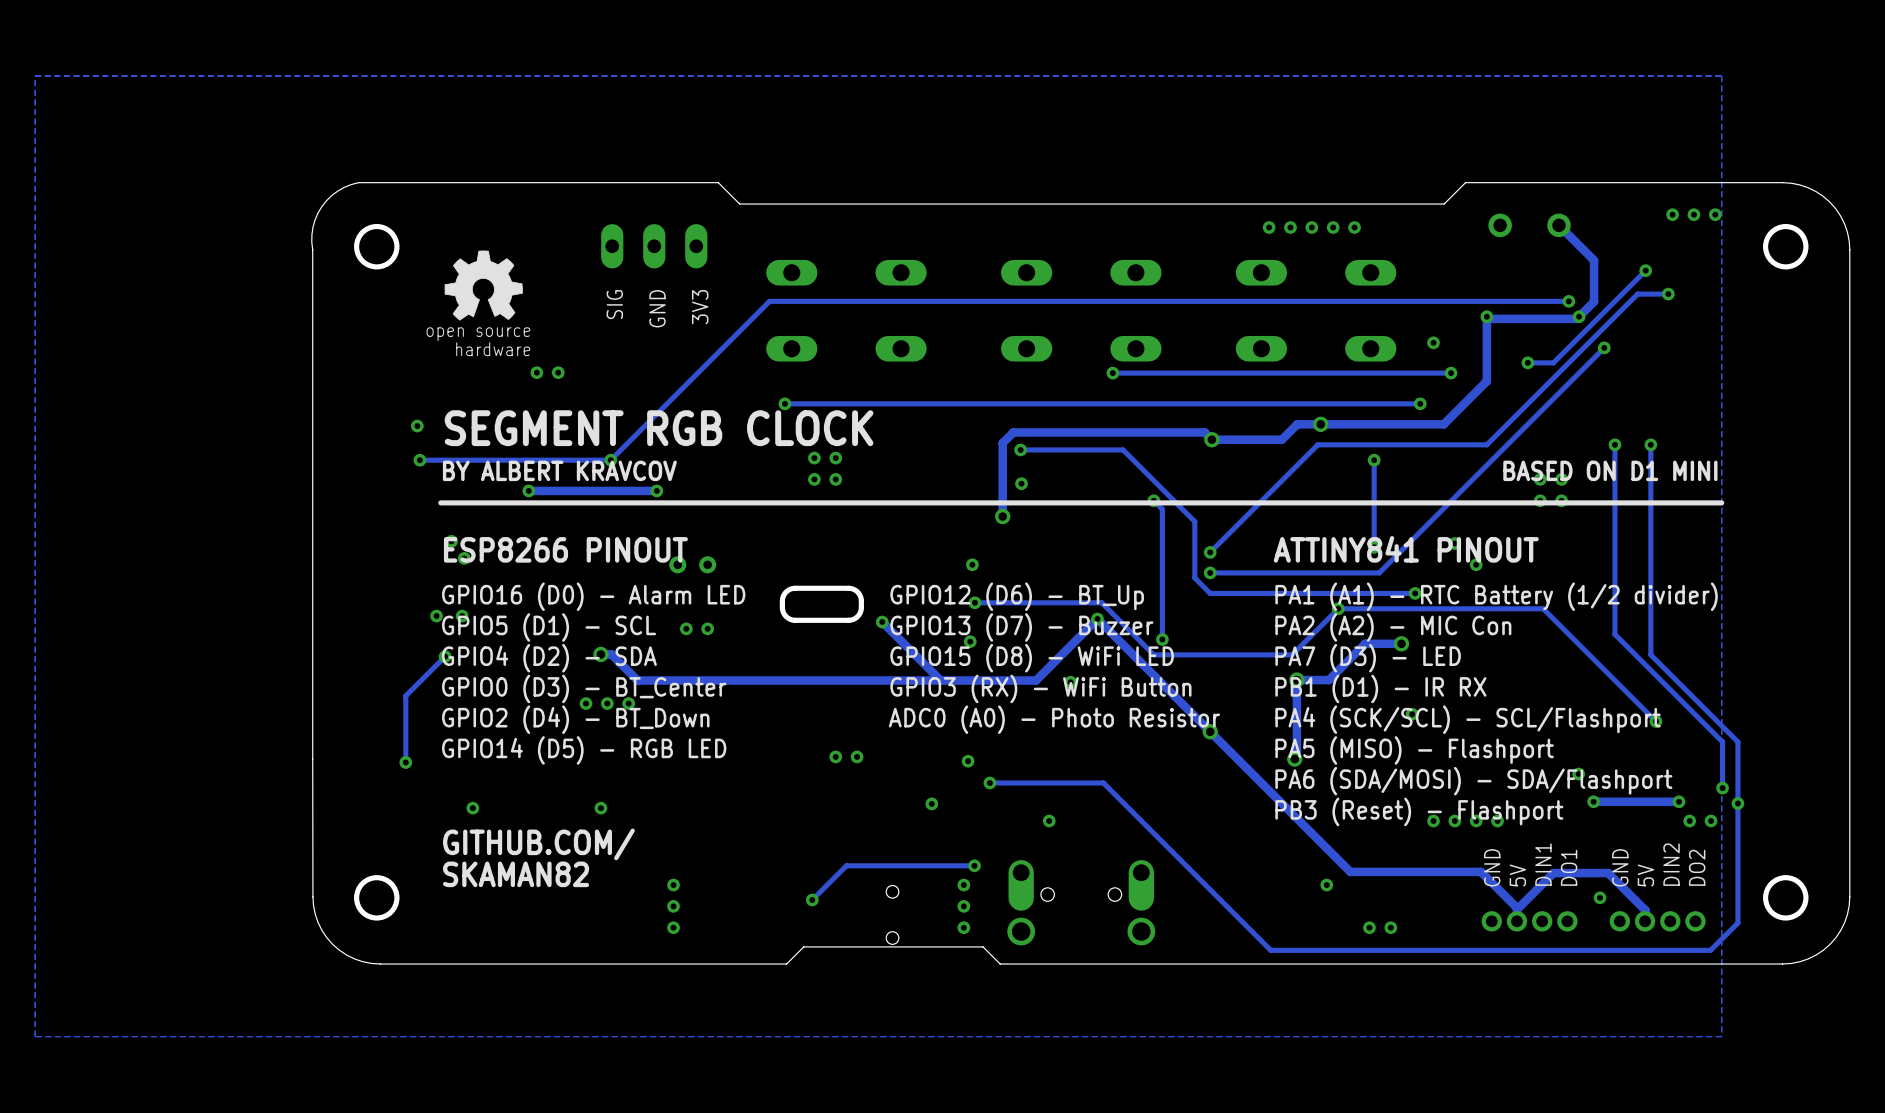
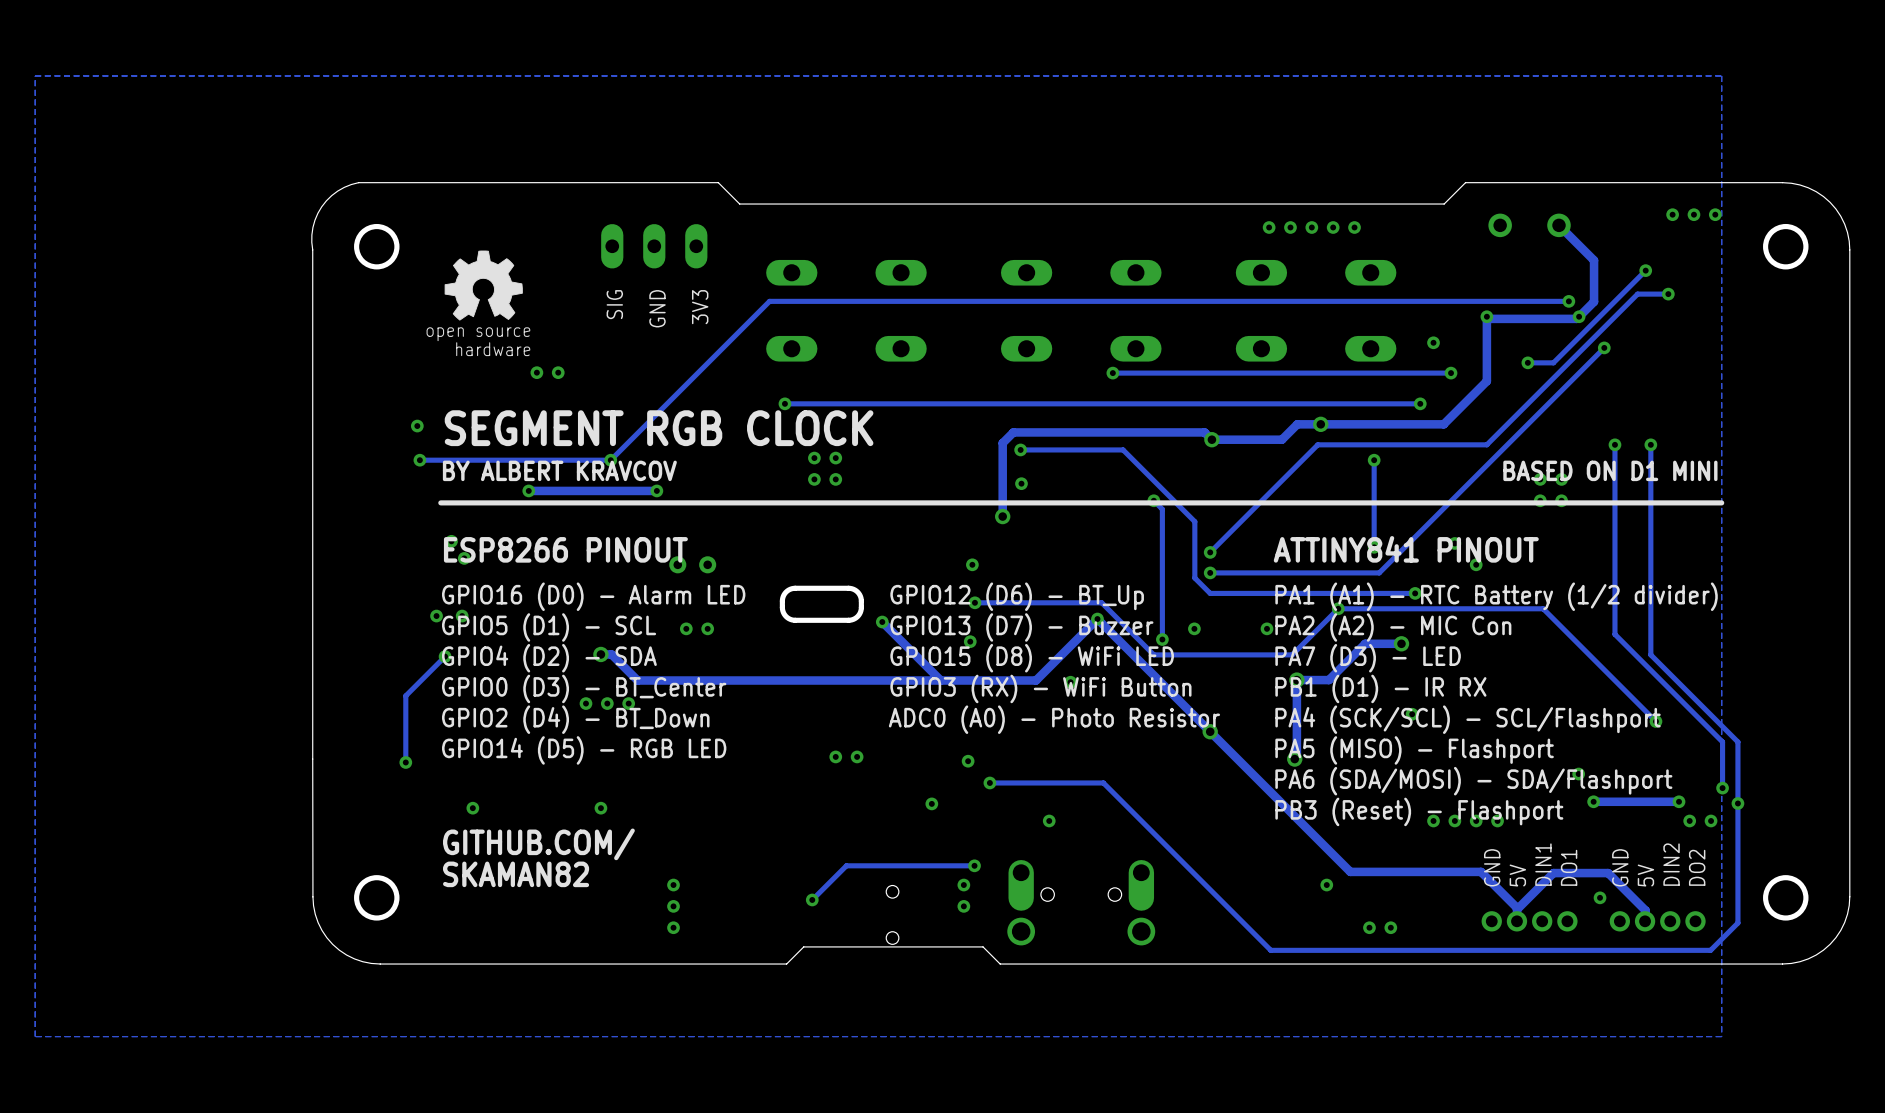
via: none -> (1194, 628)
via: none -> (1266, 628)
via: (963, 927) -> none

